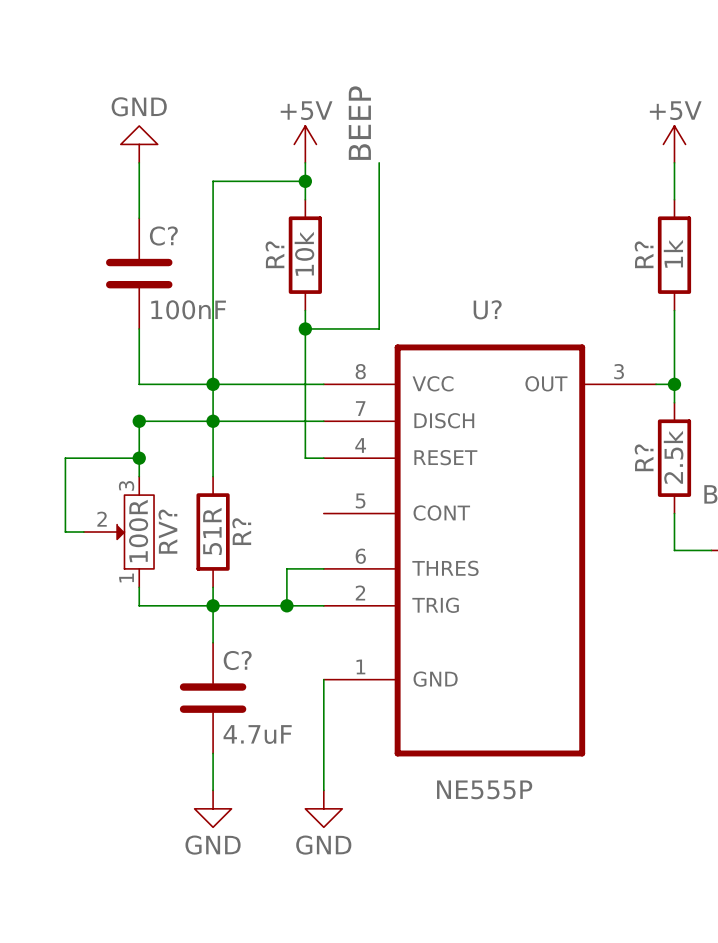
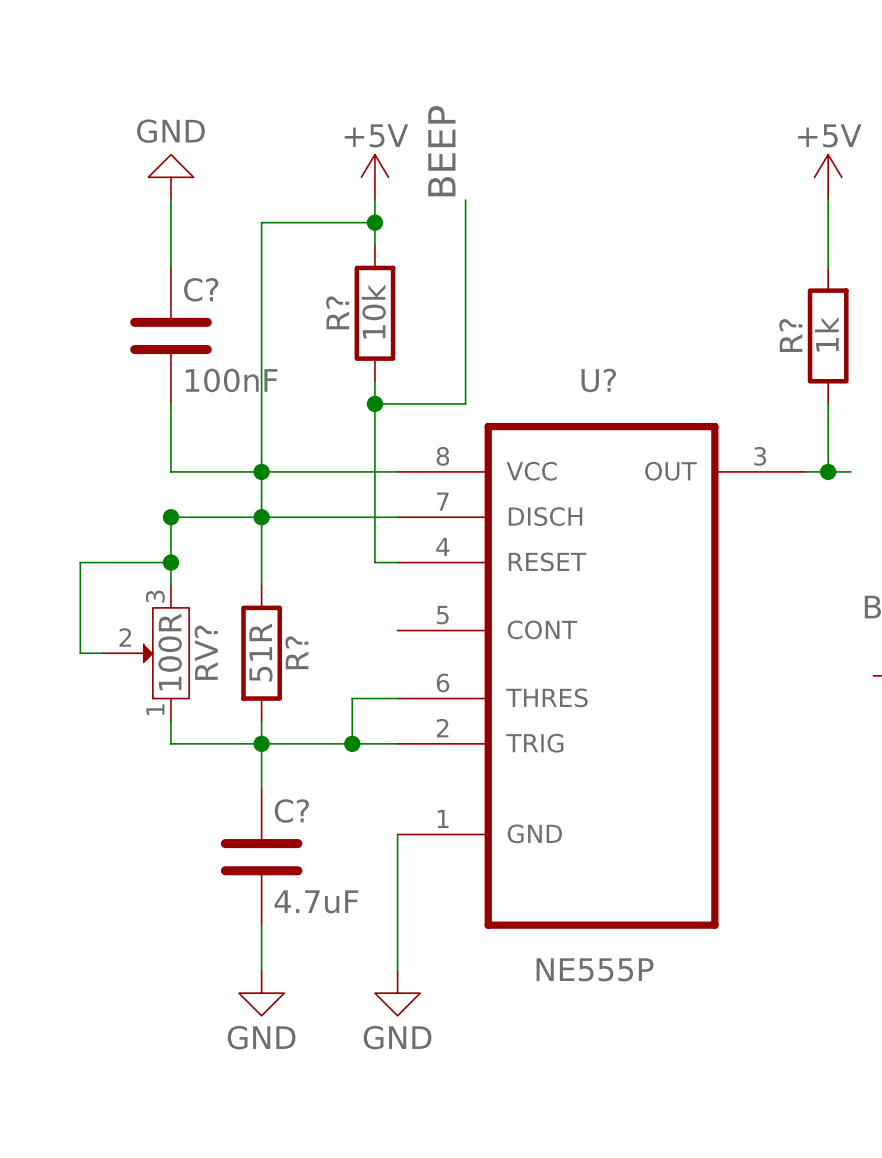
R? position: (674, 255) -> (828, 335)
wire: (674, 384) (674, 402) -> (828, 471) (850, 471)
R?: 2.5k (674, 458) -> none
wire: (674, 513) (674, 550) (711, 550) -> none

